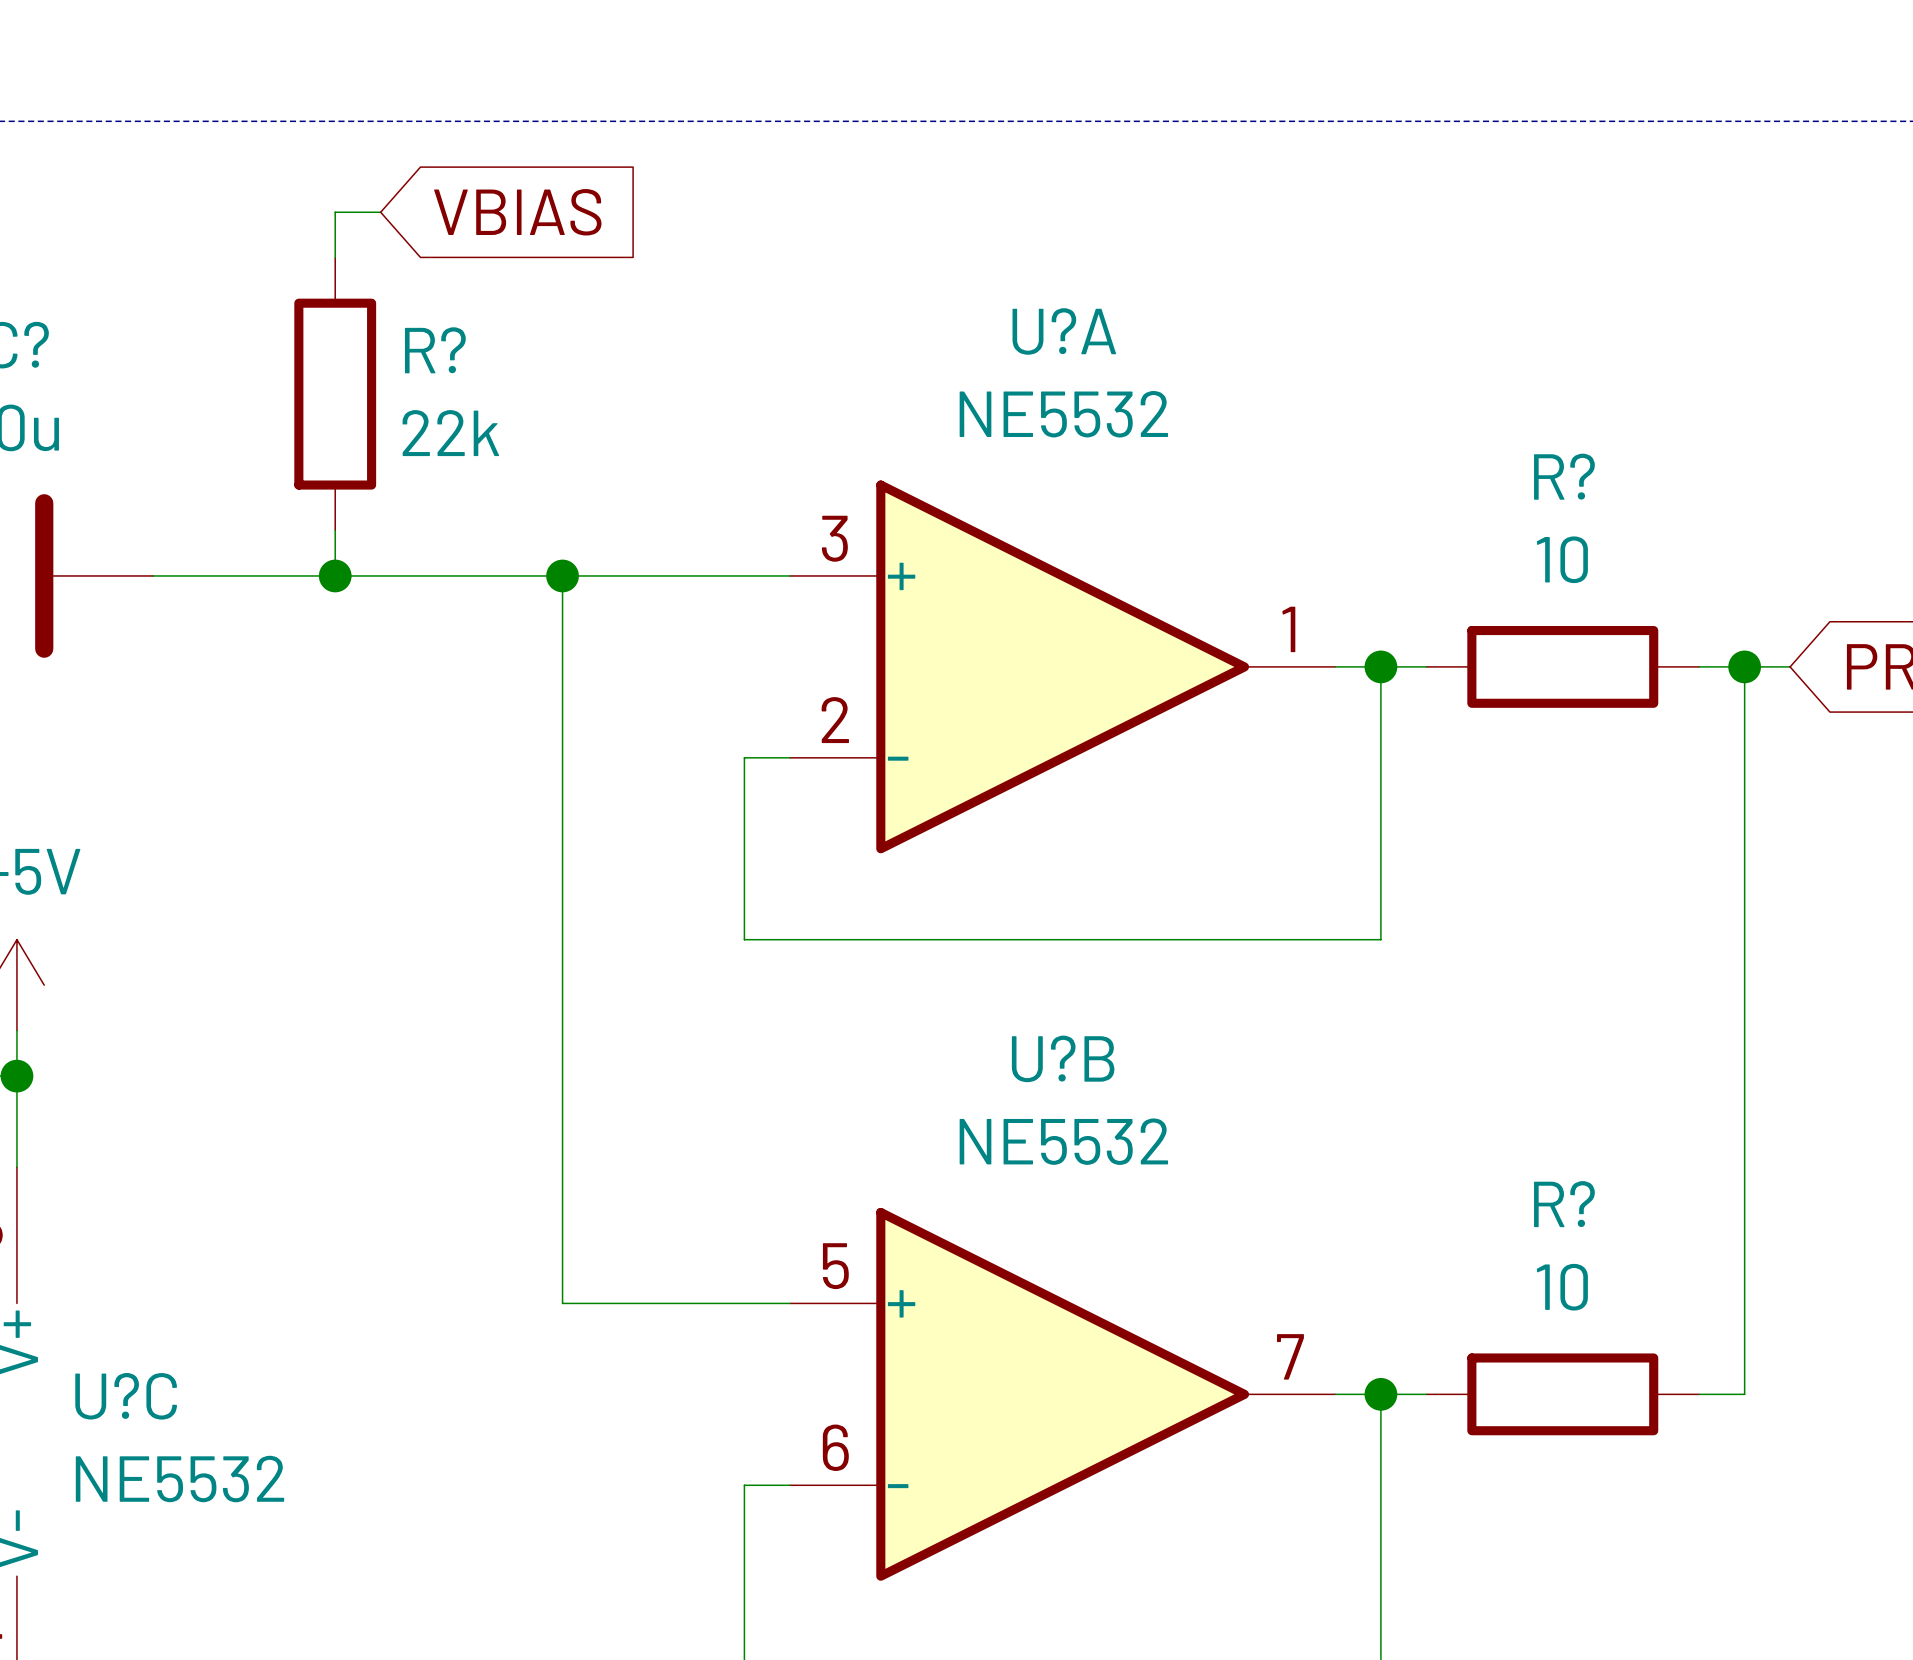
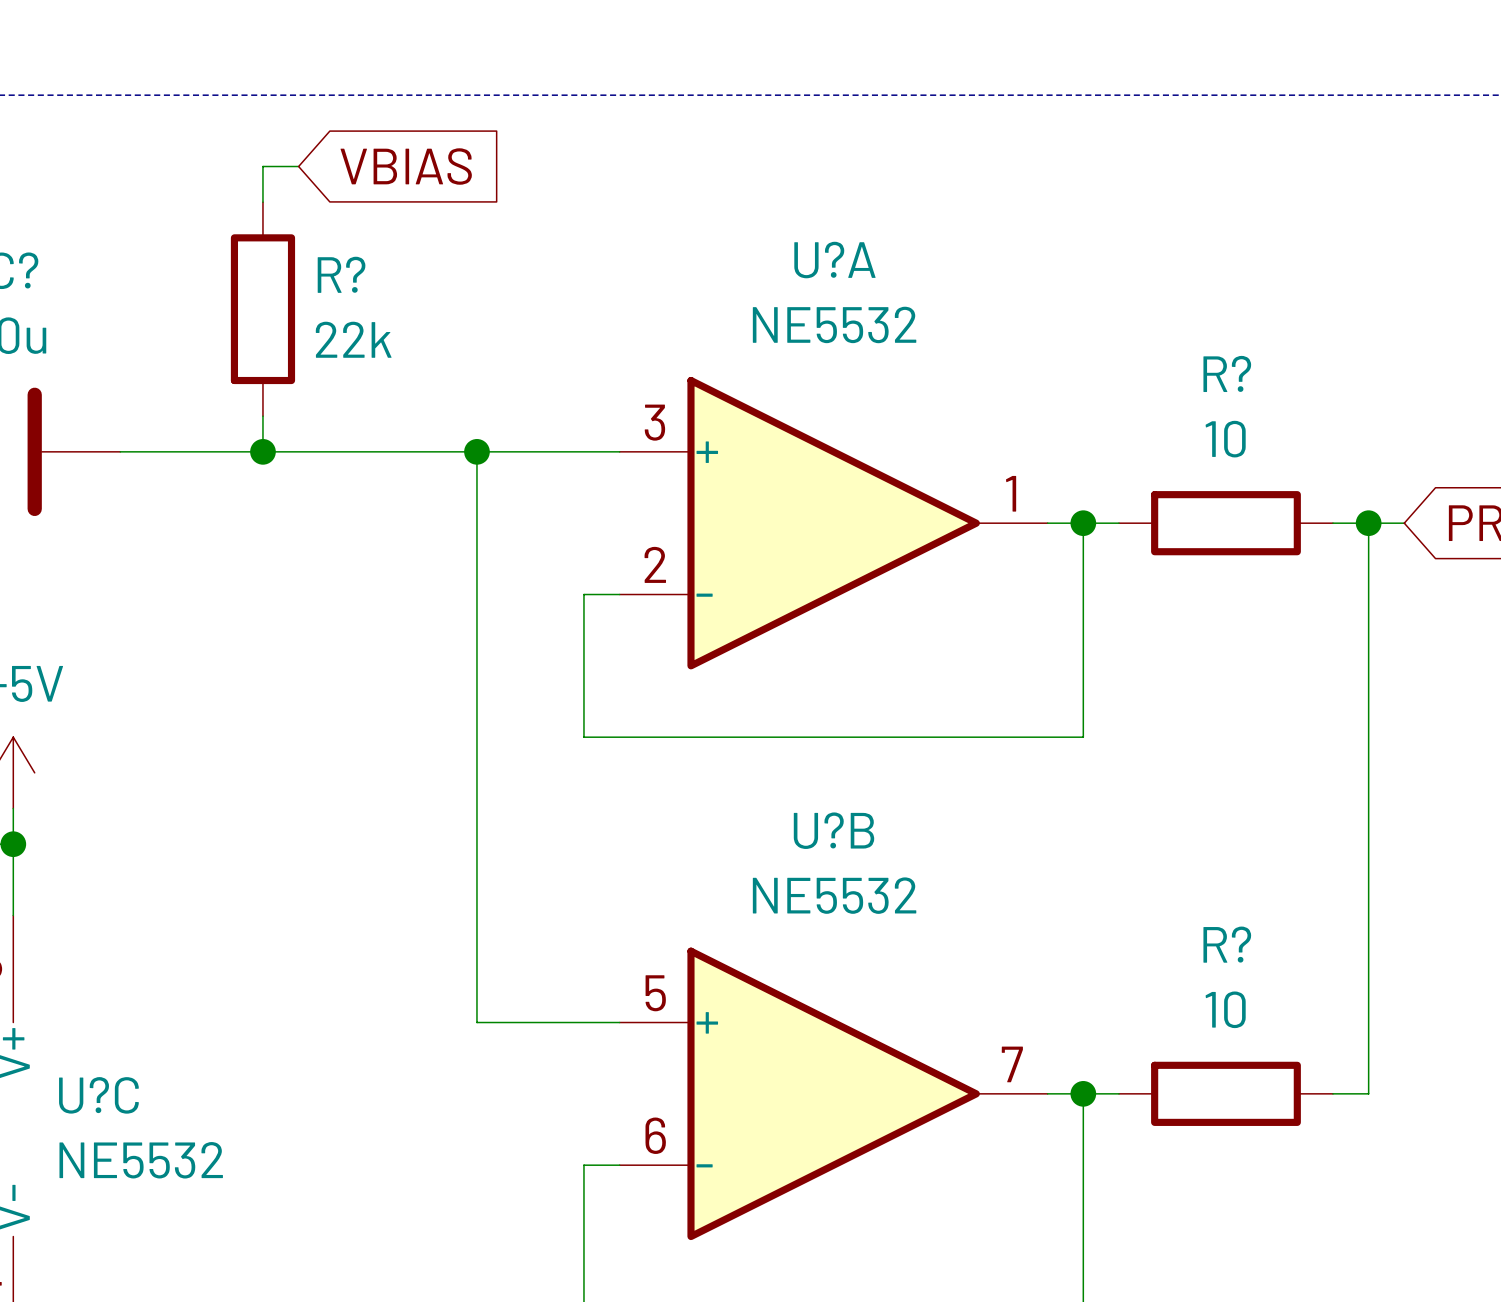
wire: (562, 575) (562, 1303) (608, 1303) -> (476, 451) (476, 1022)
junction position: (562, 575) -> (476, 451)

